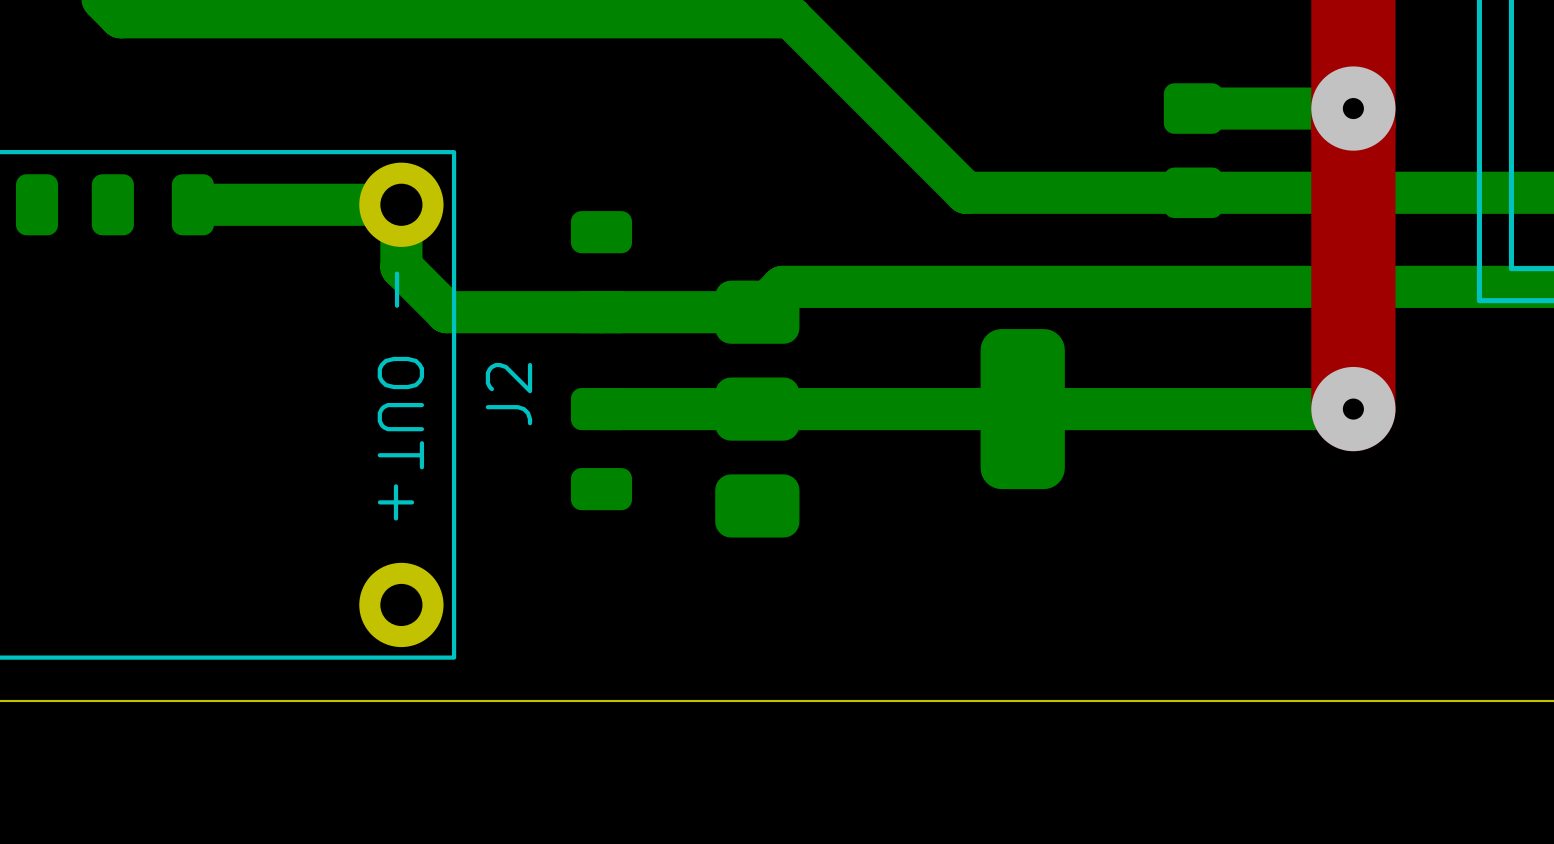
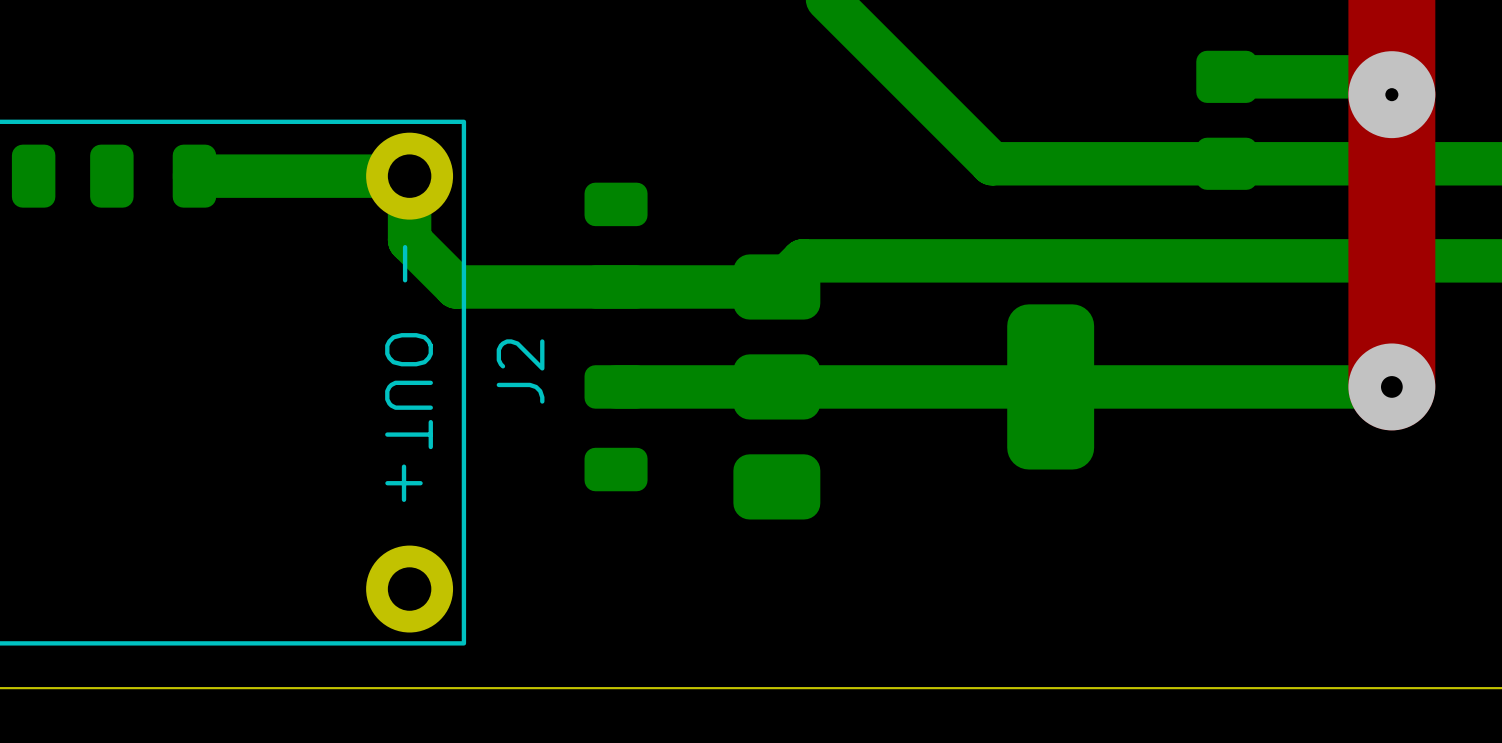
via position: (1353, 108) -> (1391, 94)

